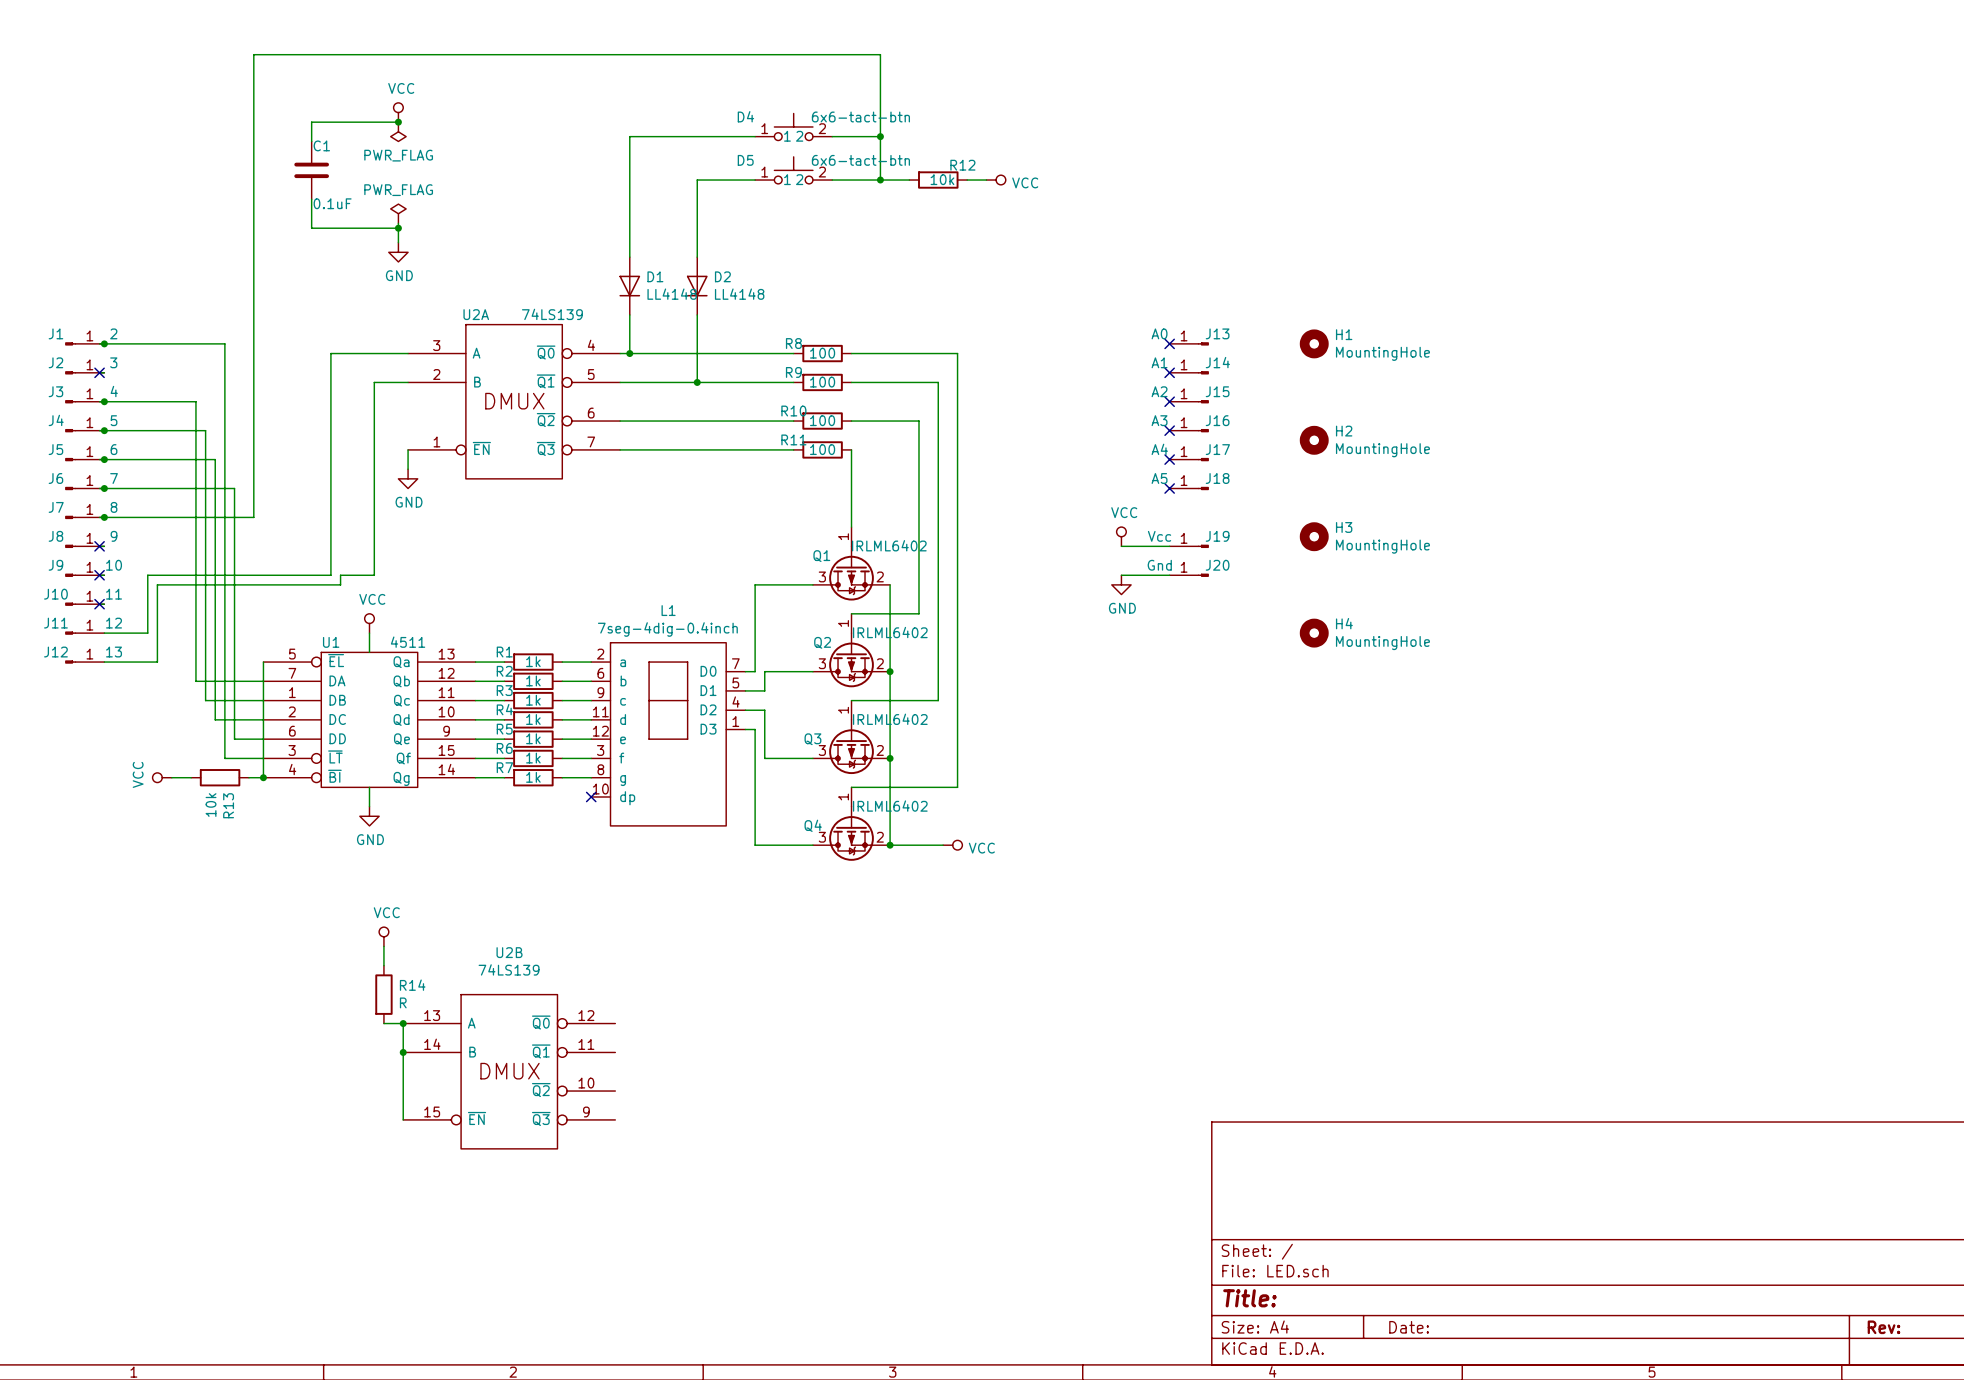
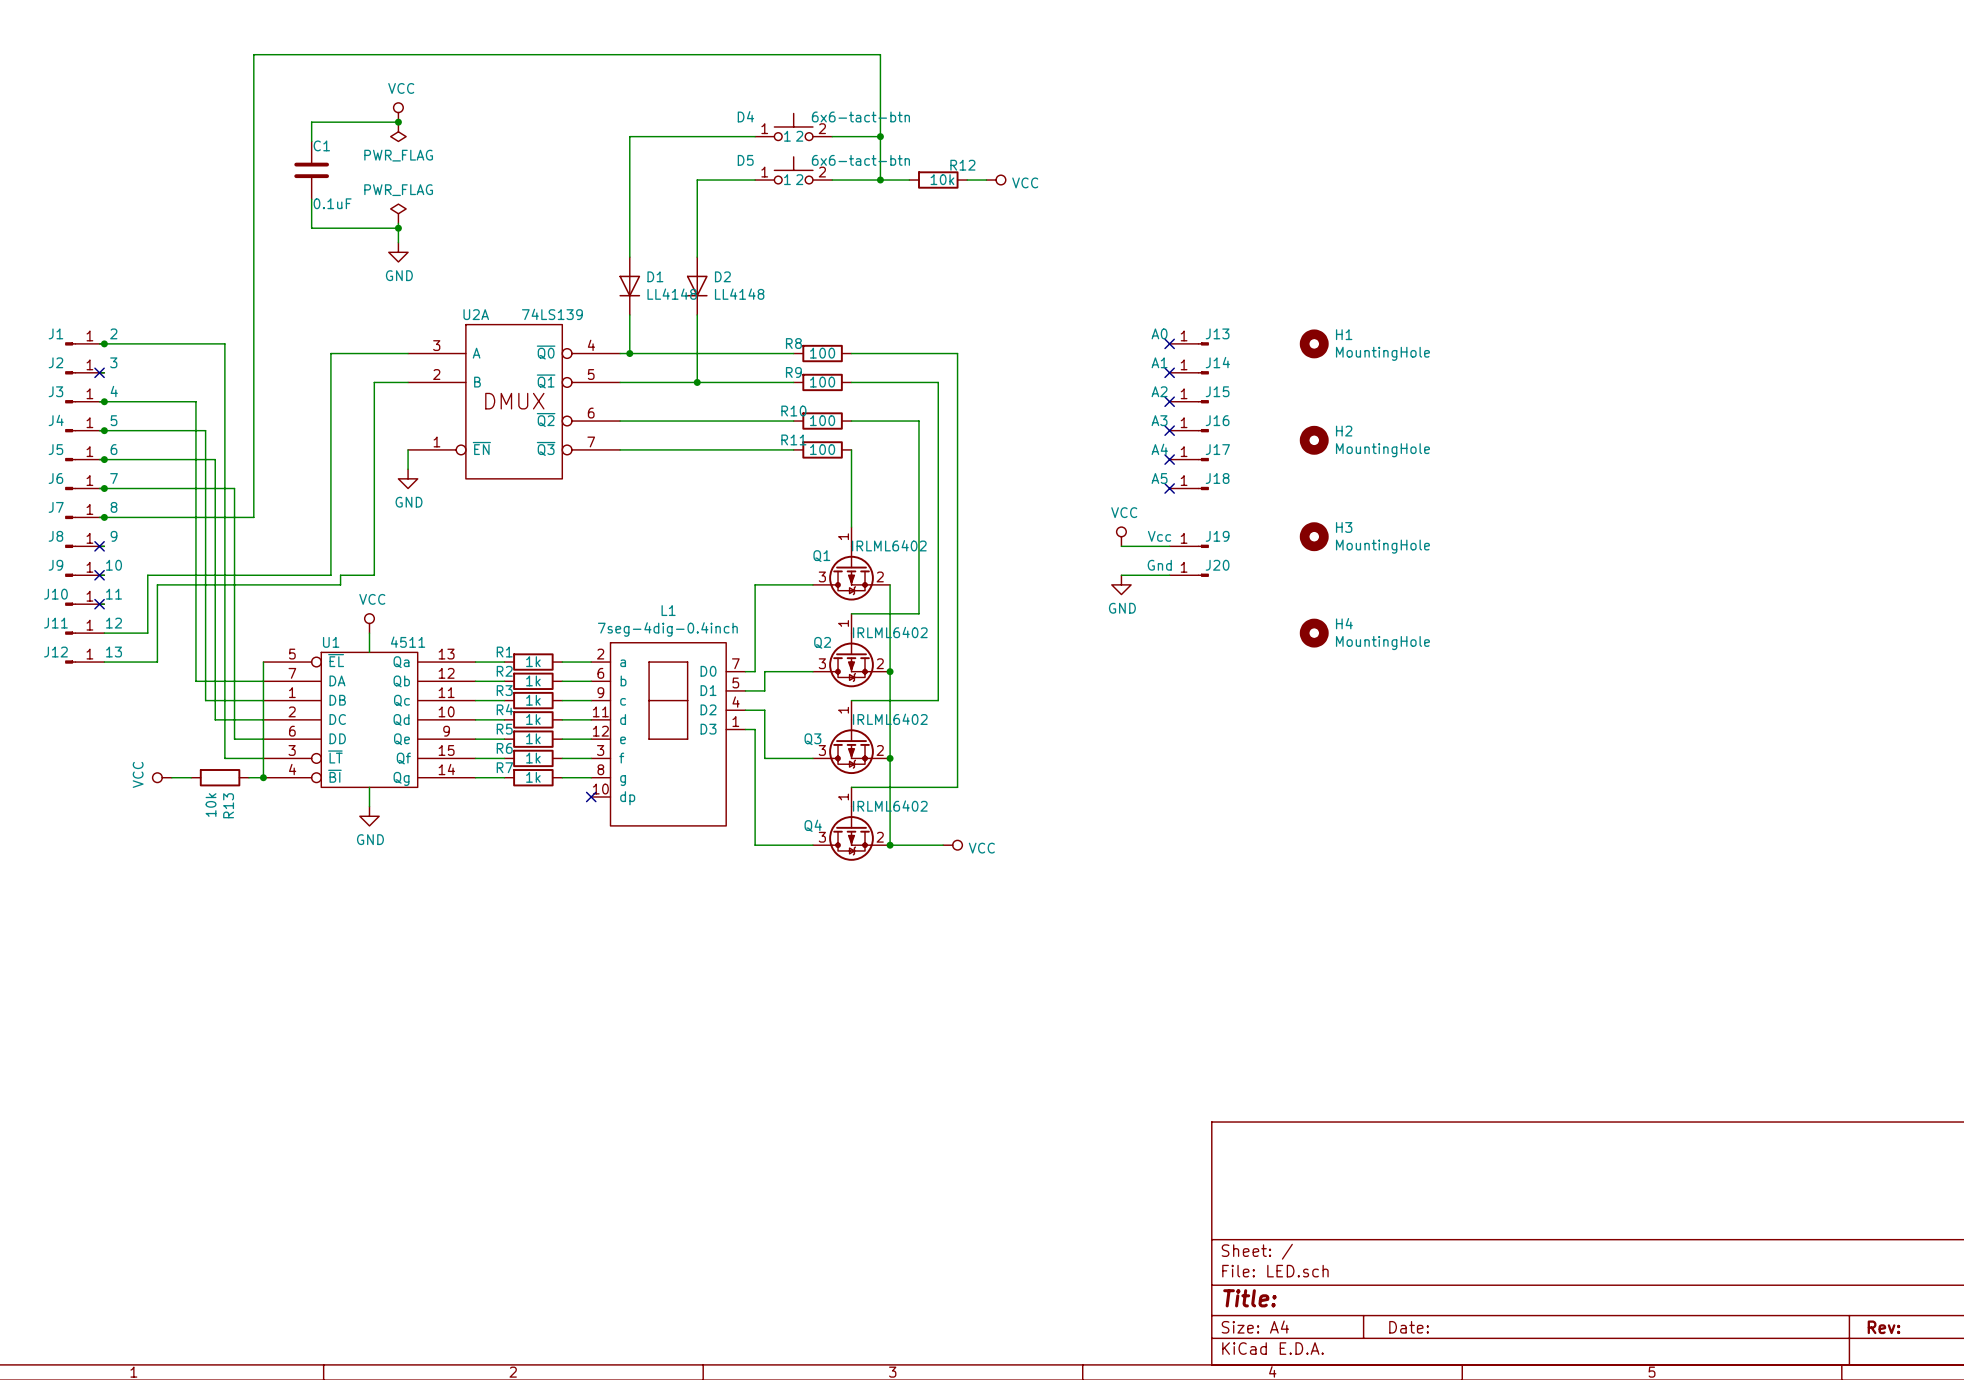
power symbol: VCC (383, 936) -> none
wire: (383, 946) (383, 965) -> none
R14: R (383, 994) -> none
wire: (383, 1023) (403, 1023) (403, 1119) -> none
junction: (403, 1023) -> none
junction: (403, 1052) -> none
U2B: 74LS139 (509, 1071) -> none

